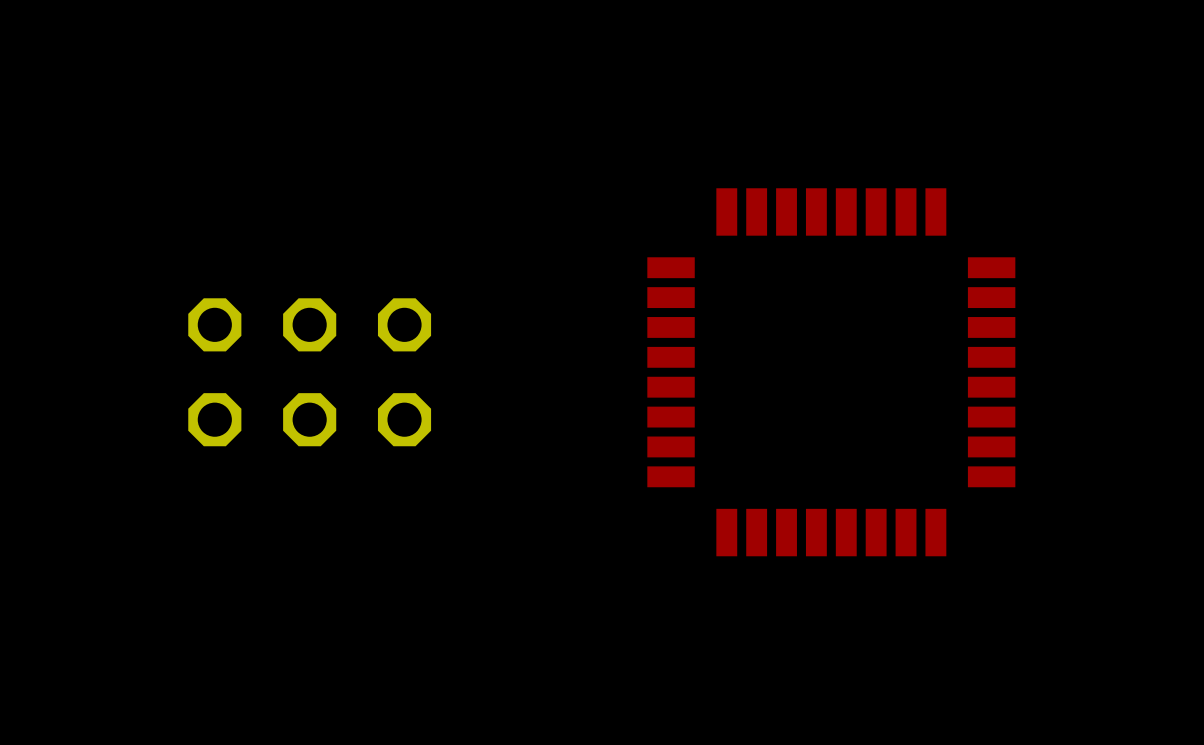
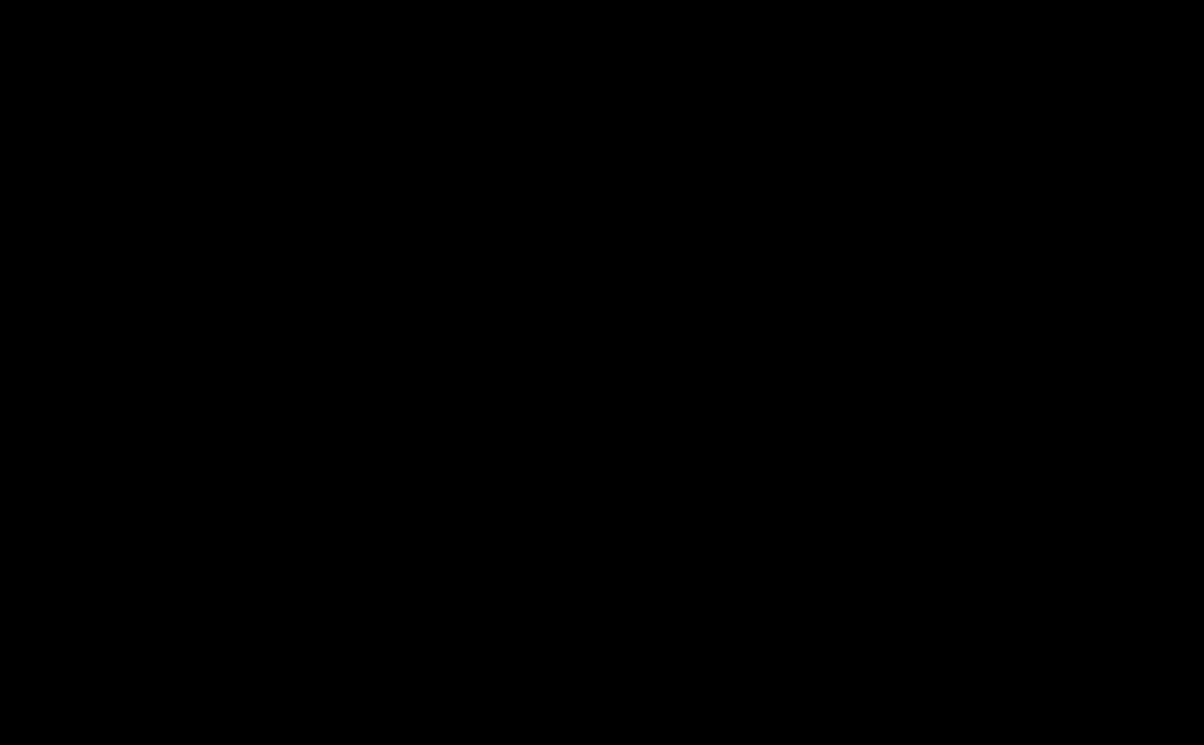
part: (309, 372) -> none
part: (831, 372) -> none

